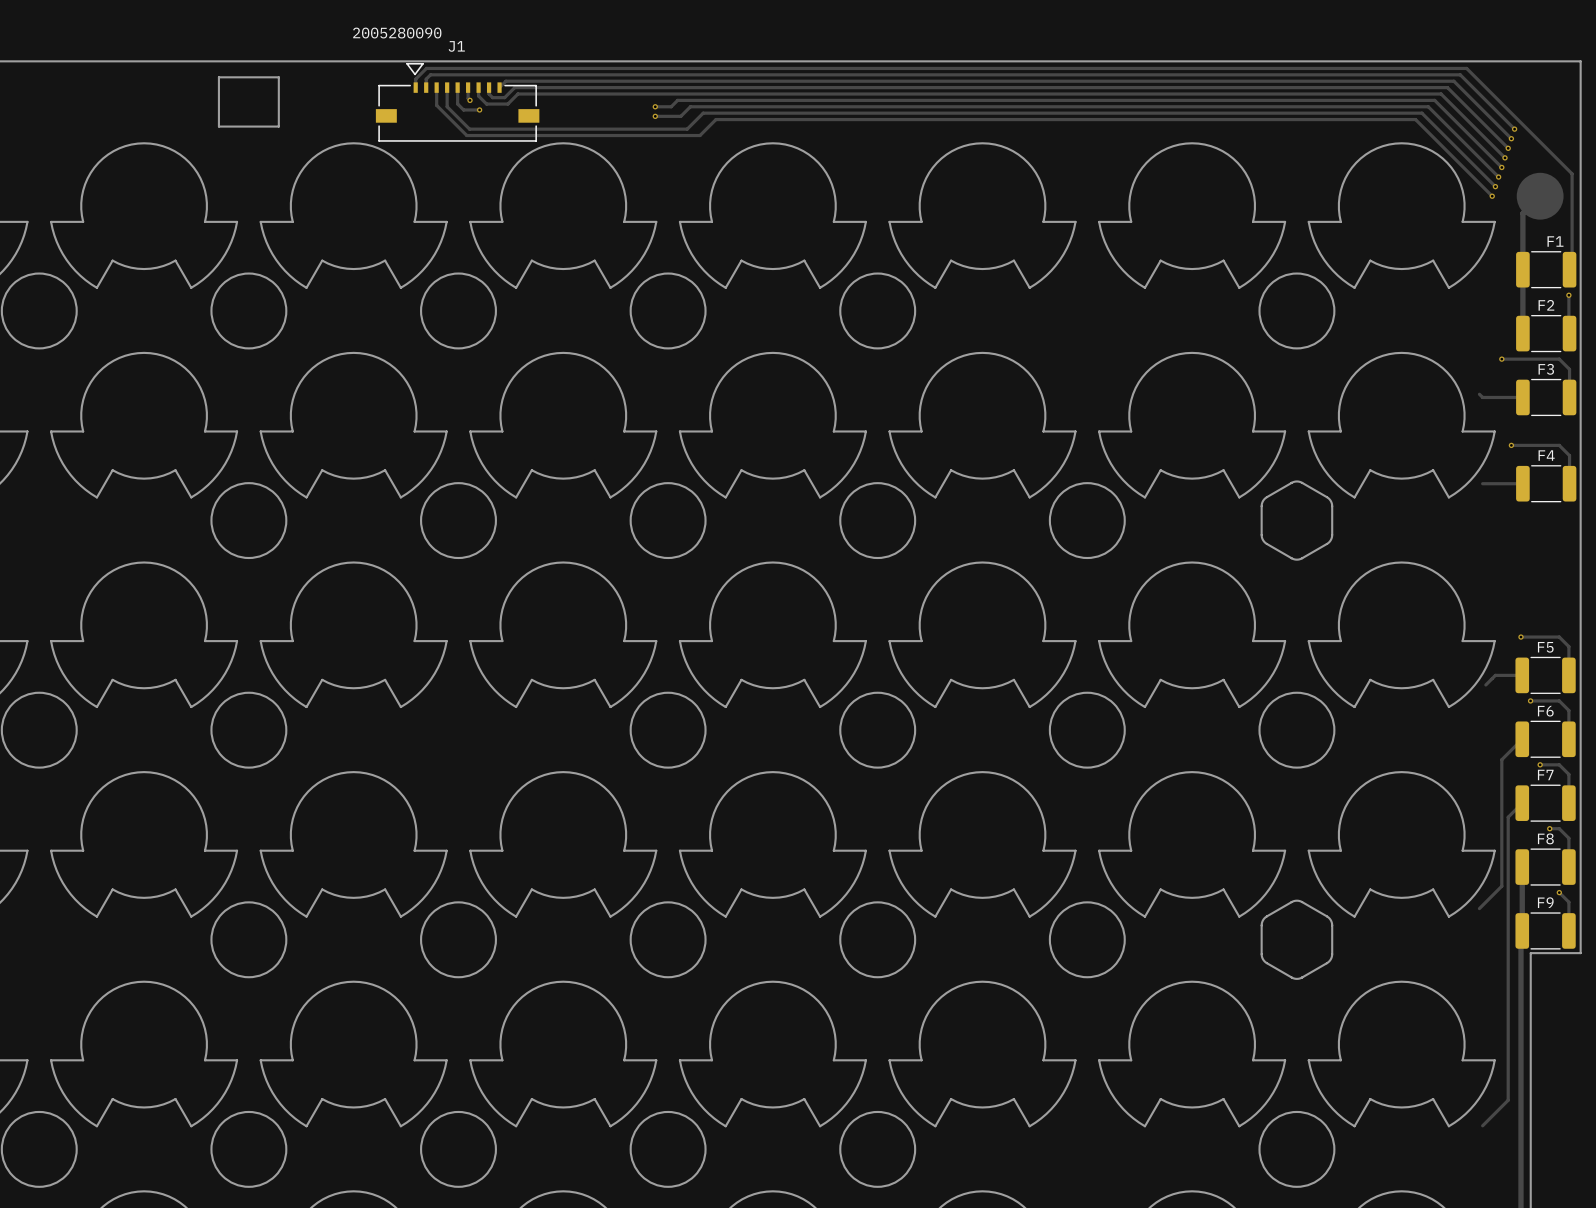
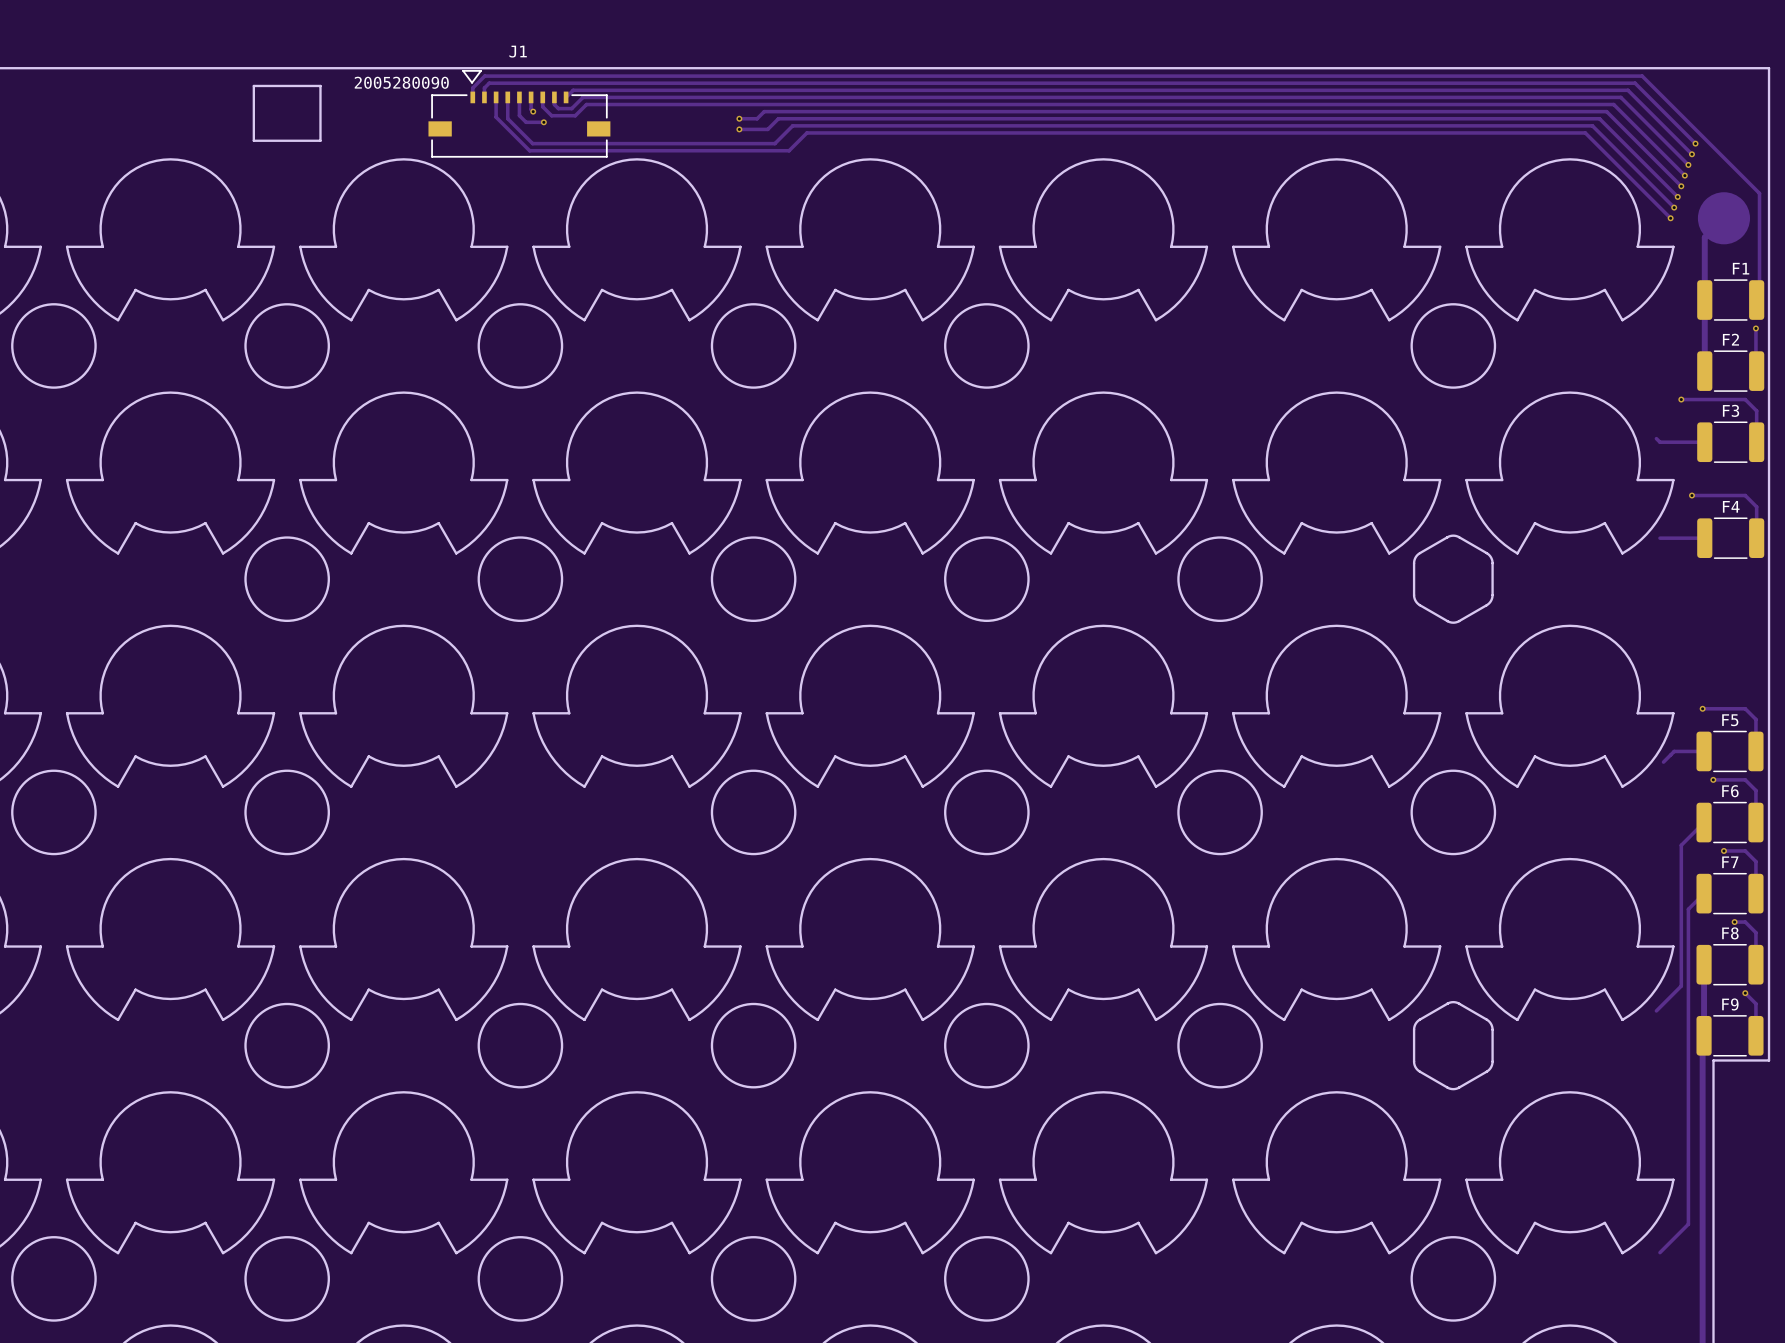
J1 text position: 2005280090 (397, 33) -> 2005280090 (401, 82)

